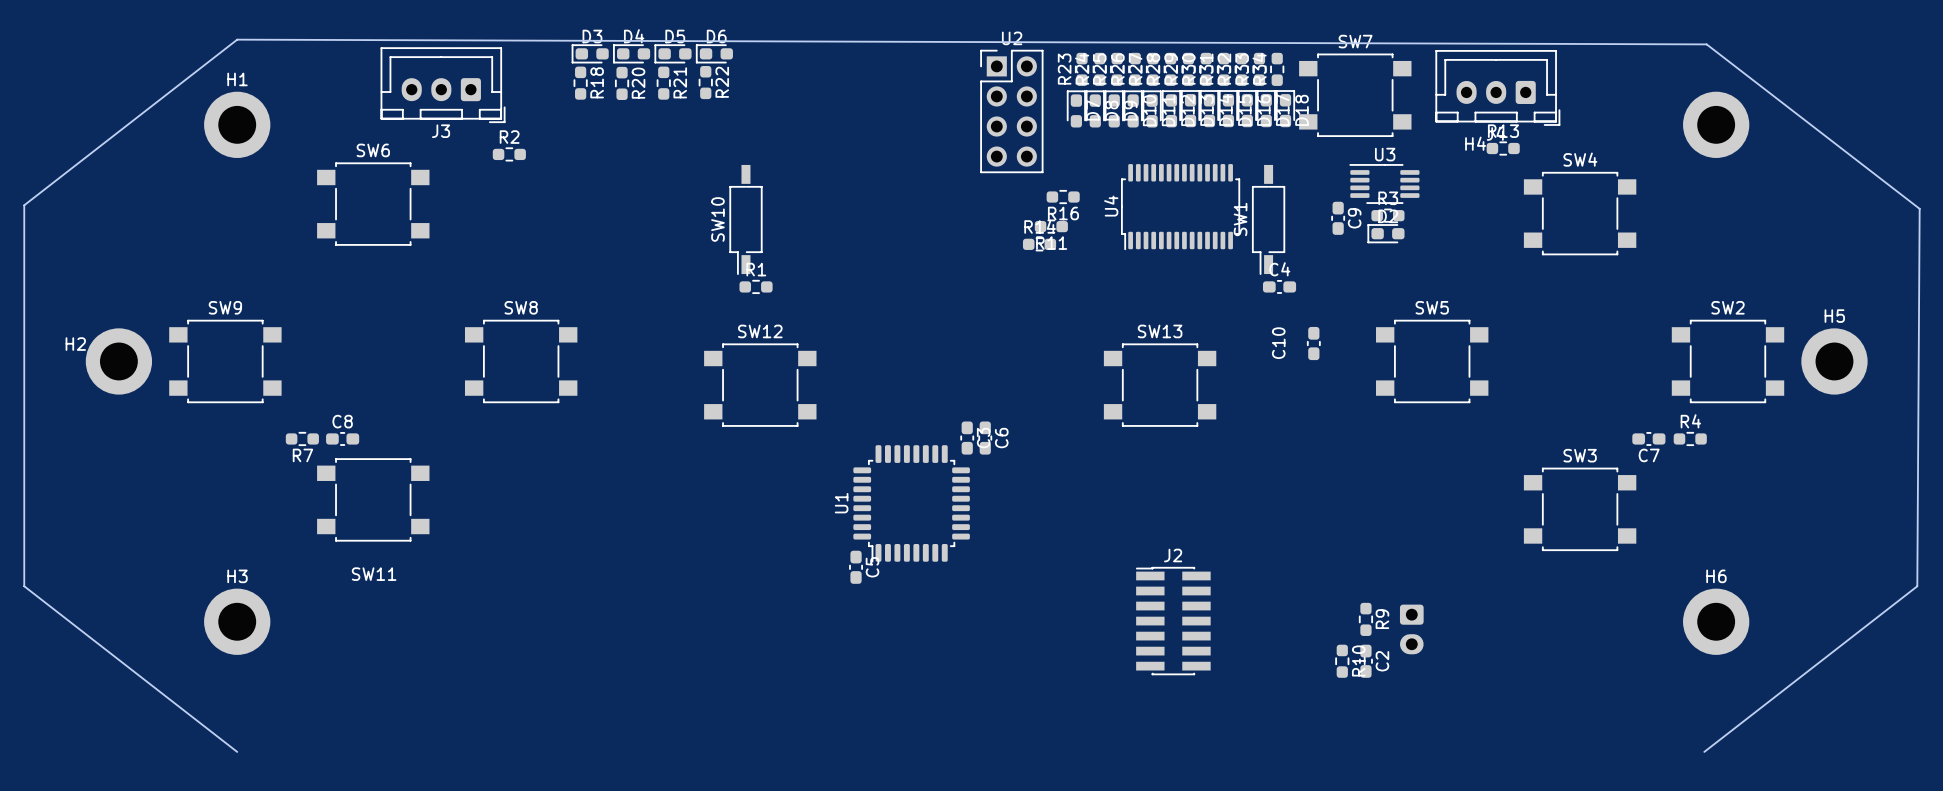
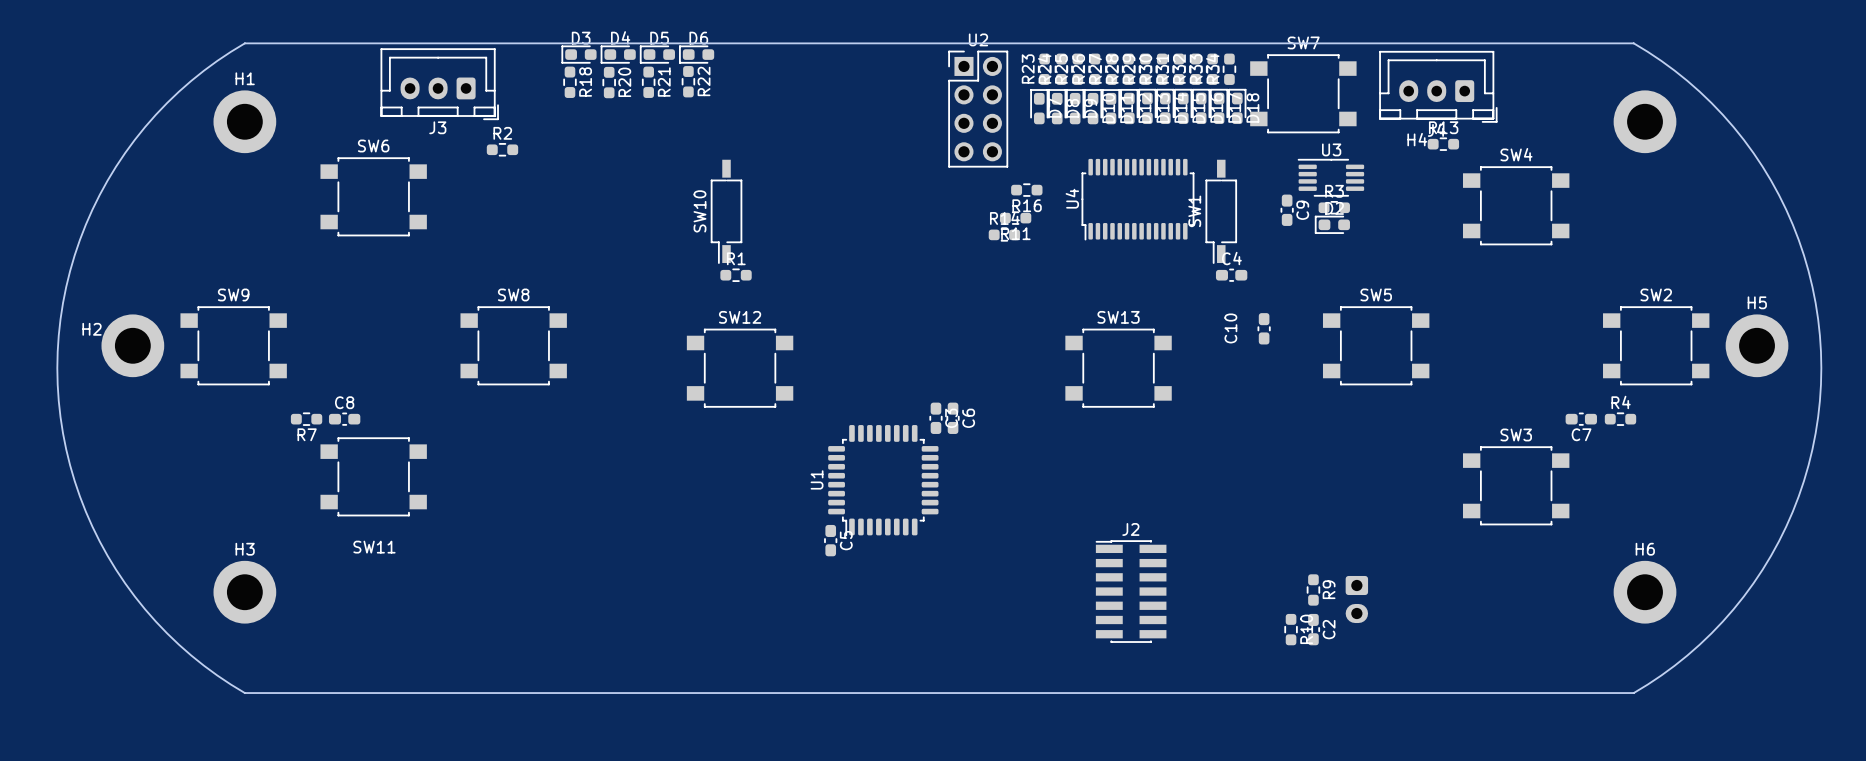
board edge: none -> (244, 43) (1633, 43) (1687, 80) (1722, 114) (1762, 166) (1792, 224) (1812, 287) (1820, 351) (1819, 400) (1808, 465) (1798, 496) (1778, 541) (1743, 596) (1722, 621) (1687, 655) (1633, 693) (244, 693) (204, 665) (167, 633) (134, 596) (107, 555) (85, 511) (70, 465) (60, 417) (57, 368) (60, 319) (70, 271) (85, 224) (107, 180) (134, 139) (167, 102) (204, 70) (244, 43)
board edge: (237, 751) (24, 586) (24, 205) (237, 39) (1706, 44) (1919, 208) (1917, 586) (1704, 751) -> none

